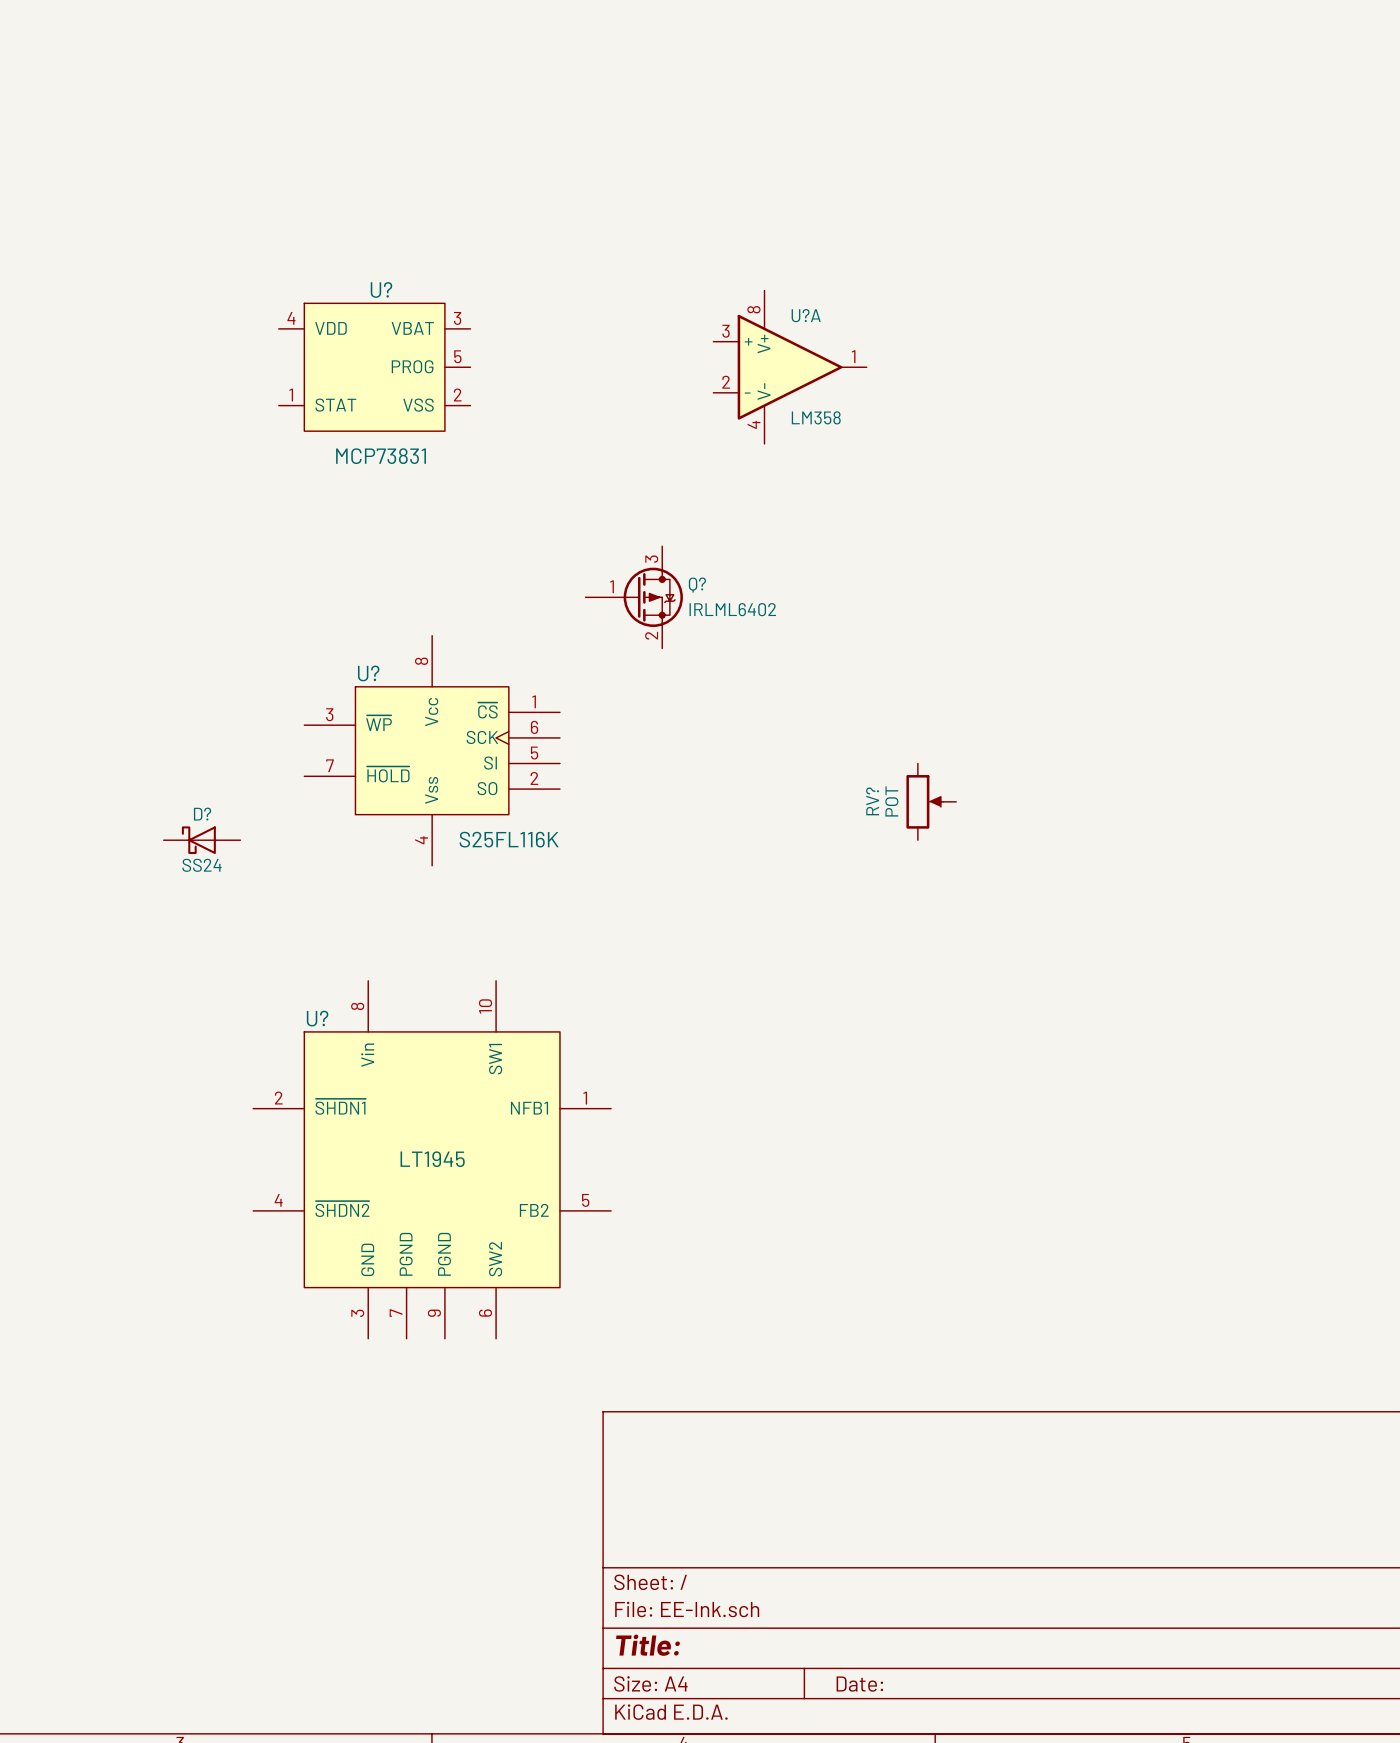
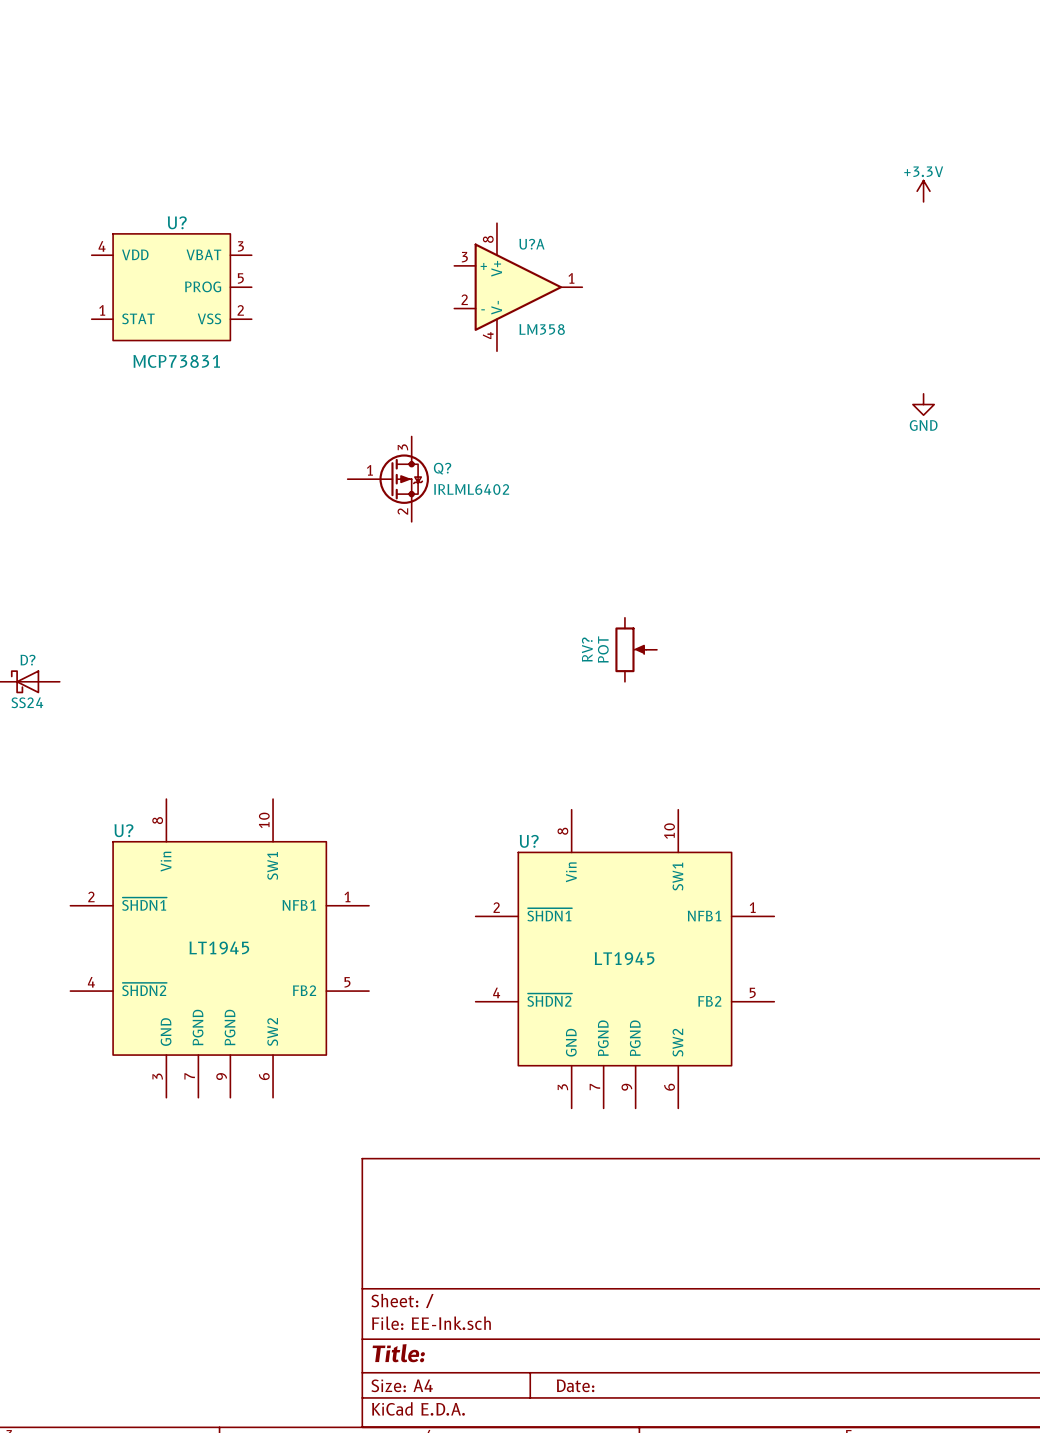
power symbol: none -> +3.3V (923, 191)
power symbol: none -> GND (923, 404)
U?: S25FL116K (432, 750) -> none
U?: none -> LT1945 (624, 959)

